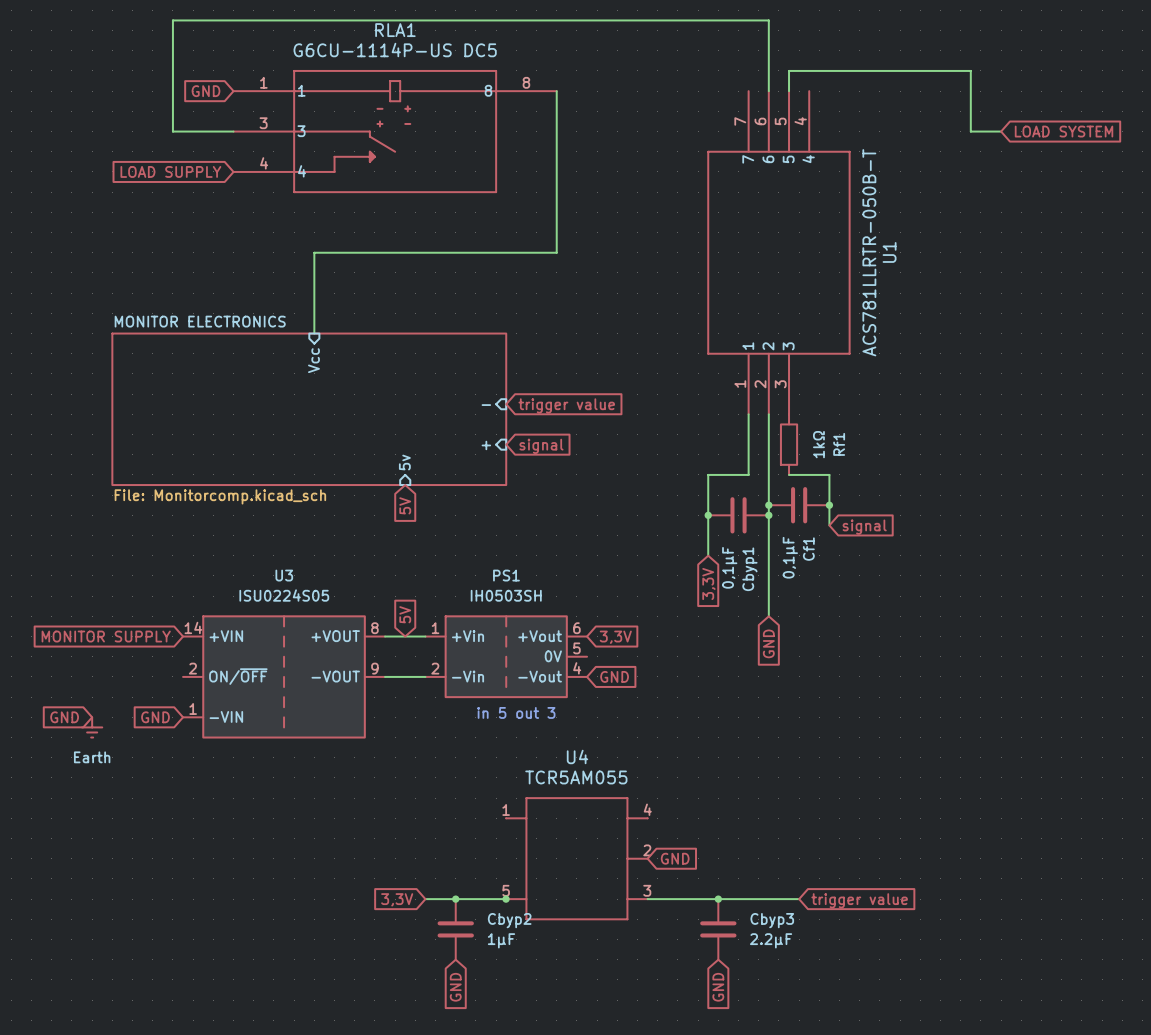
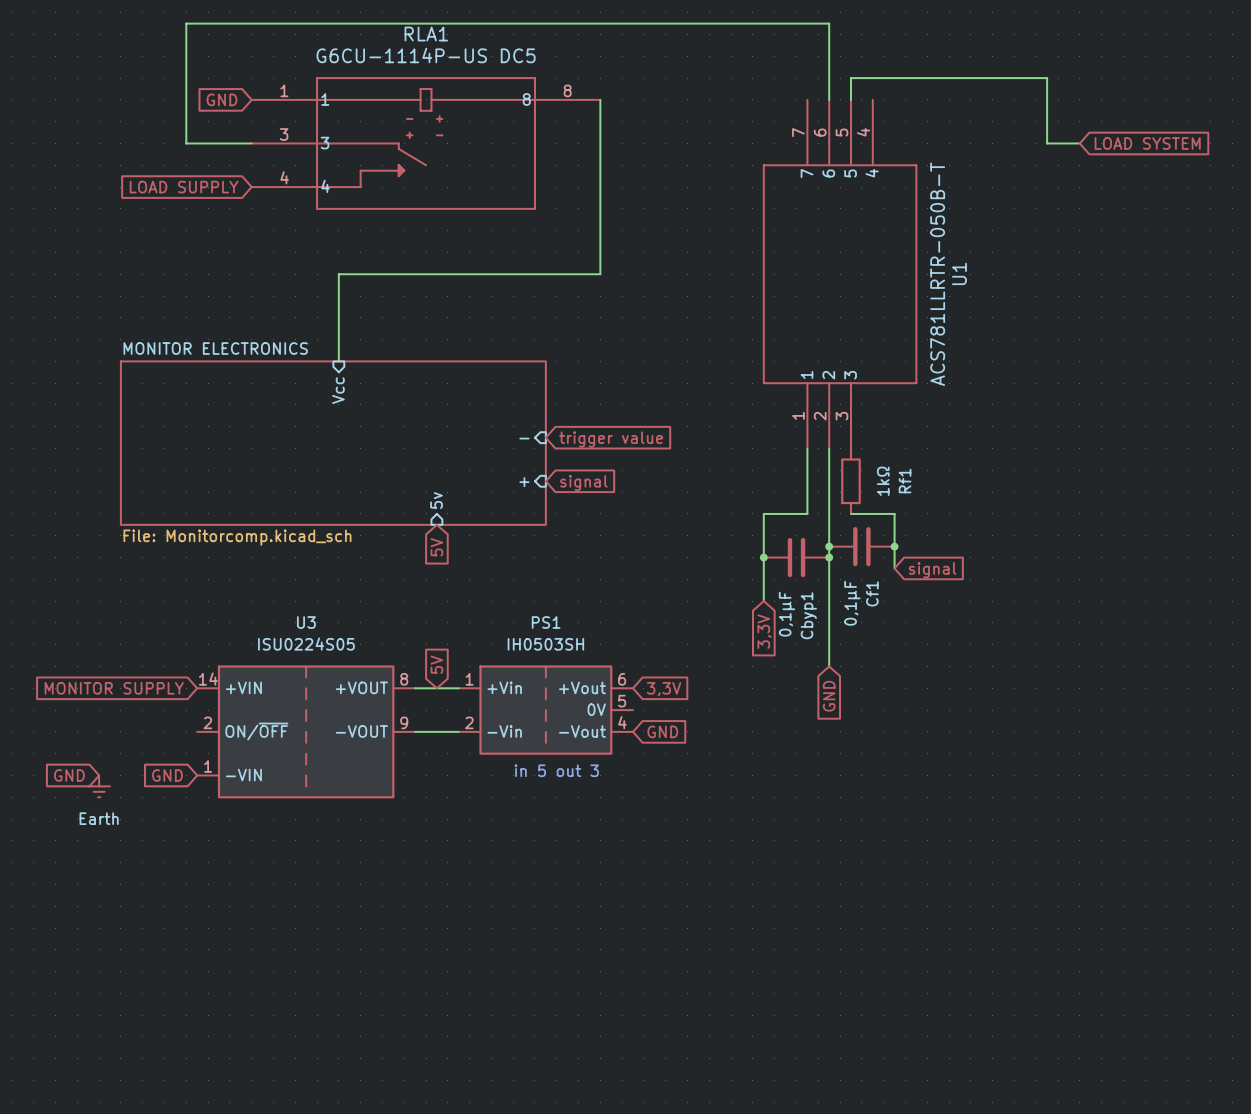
U4: TCR5AM055 (576, 858) -> none
global label: GND (675, 858) -> none
global label: 3,3V (397, 899) -> none
wire: (425, 899) (506, 899) -> none
junction: (455, 899) -> none
junction: (506, 899) -> none
wire: (647, 899) (799, 899) -> none
junction: (718, 899) -> none
global label: trigger value (859, 900) -> none
Cbyp2: 1μF (455, 929) -> none
Cbyp3: 2.2μF (718, 929) -> none
global label: GND (455, 987) -> none
global label: GND (718, 987) -> none

